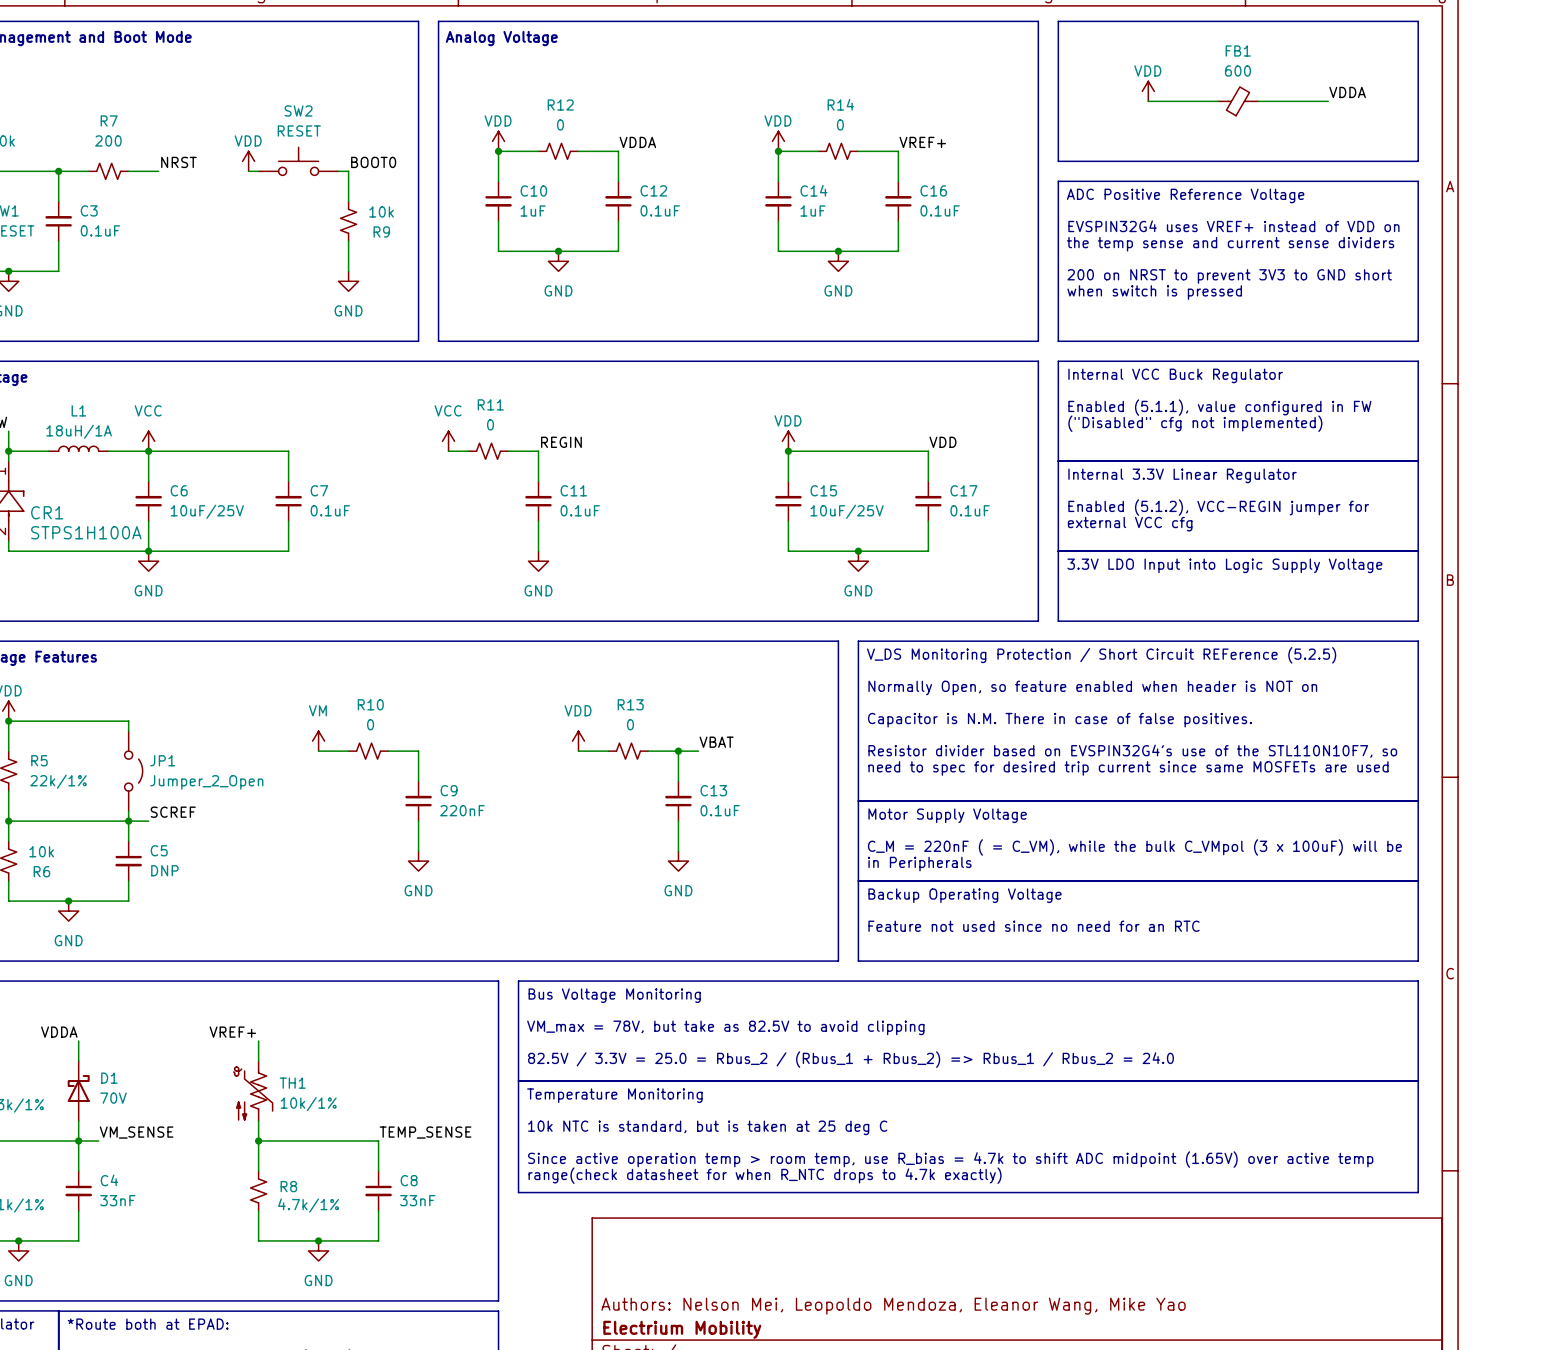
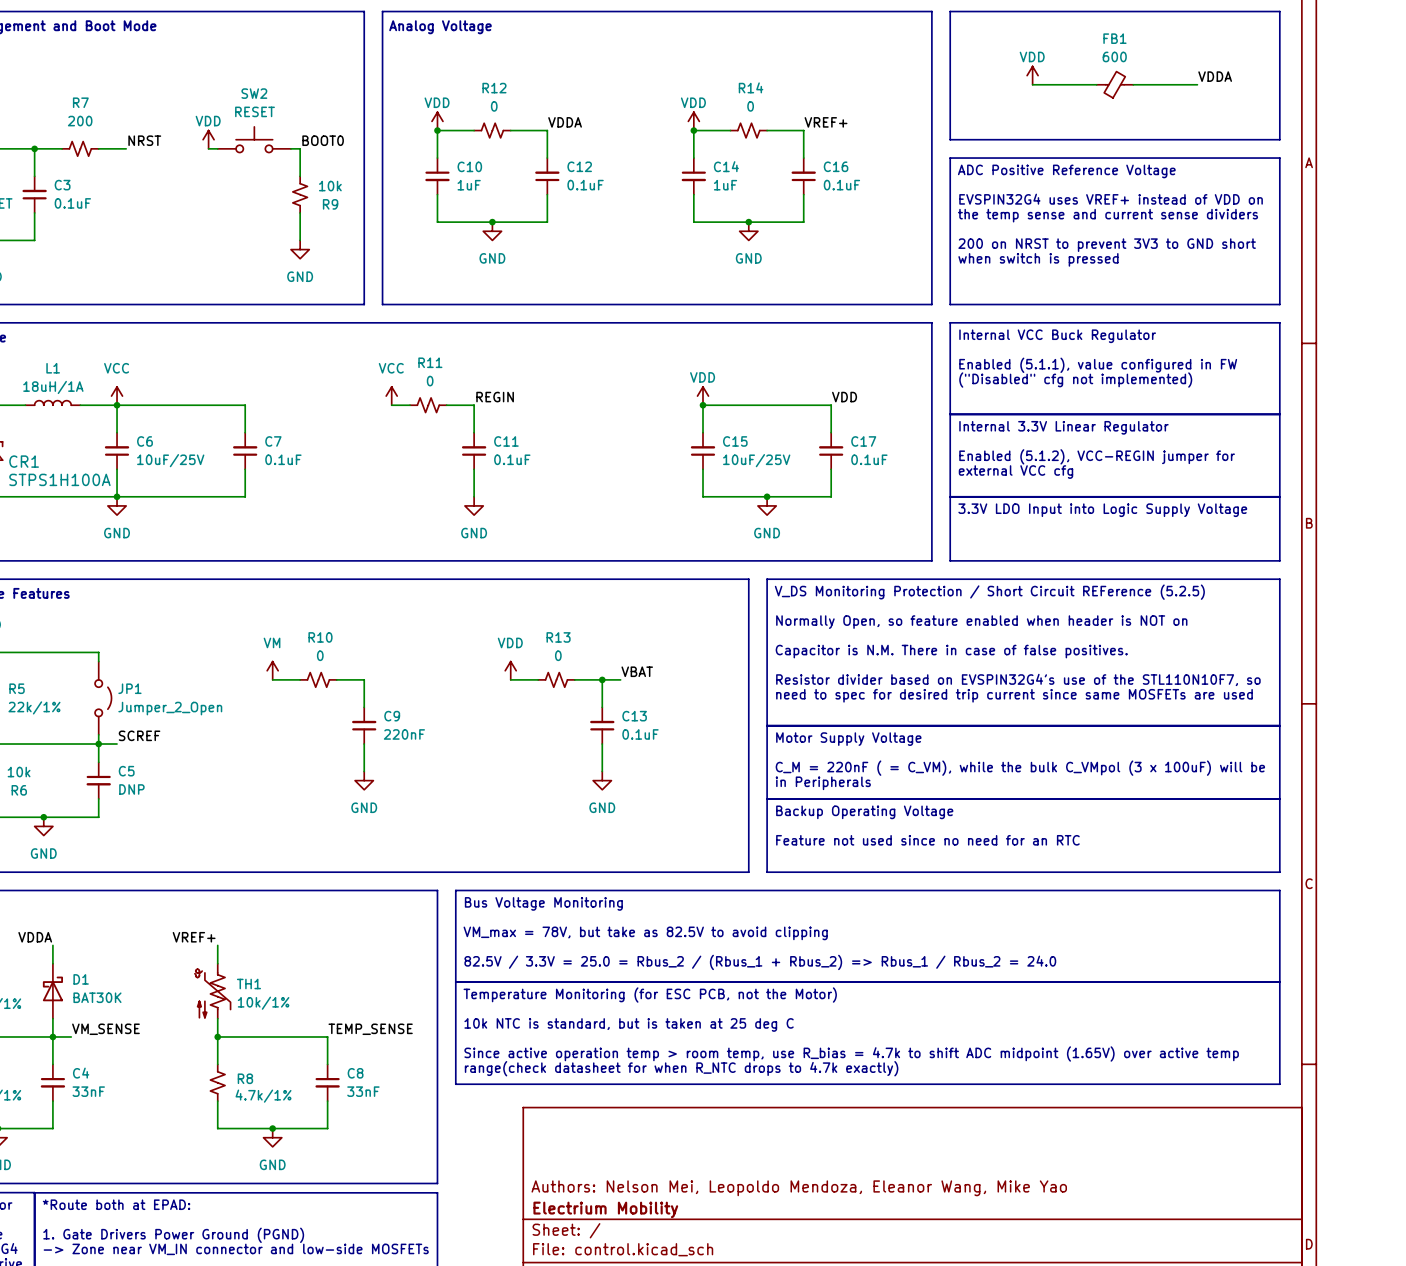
text: Temperature Monitoring (614, 1095) -> Temperature Monitoring (for ESC PCB, not the Motor) (650, 995)
D1 value: 70V (113, 1098) -> BAT30K (97, 997)

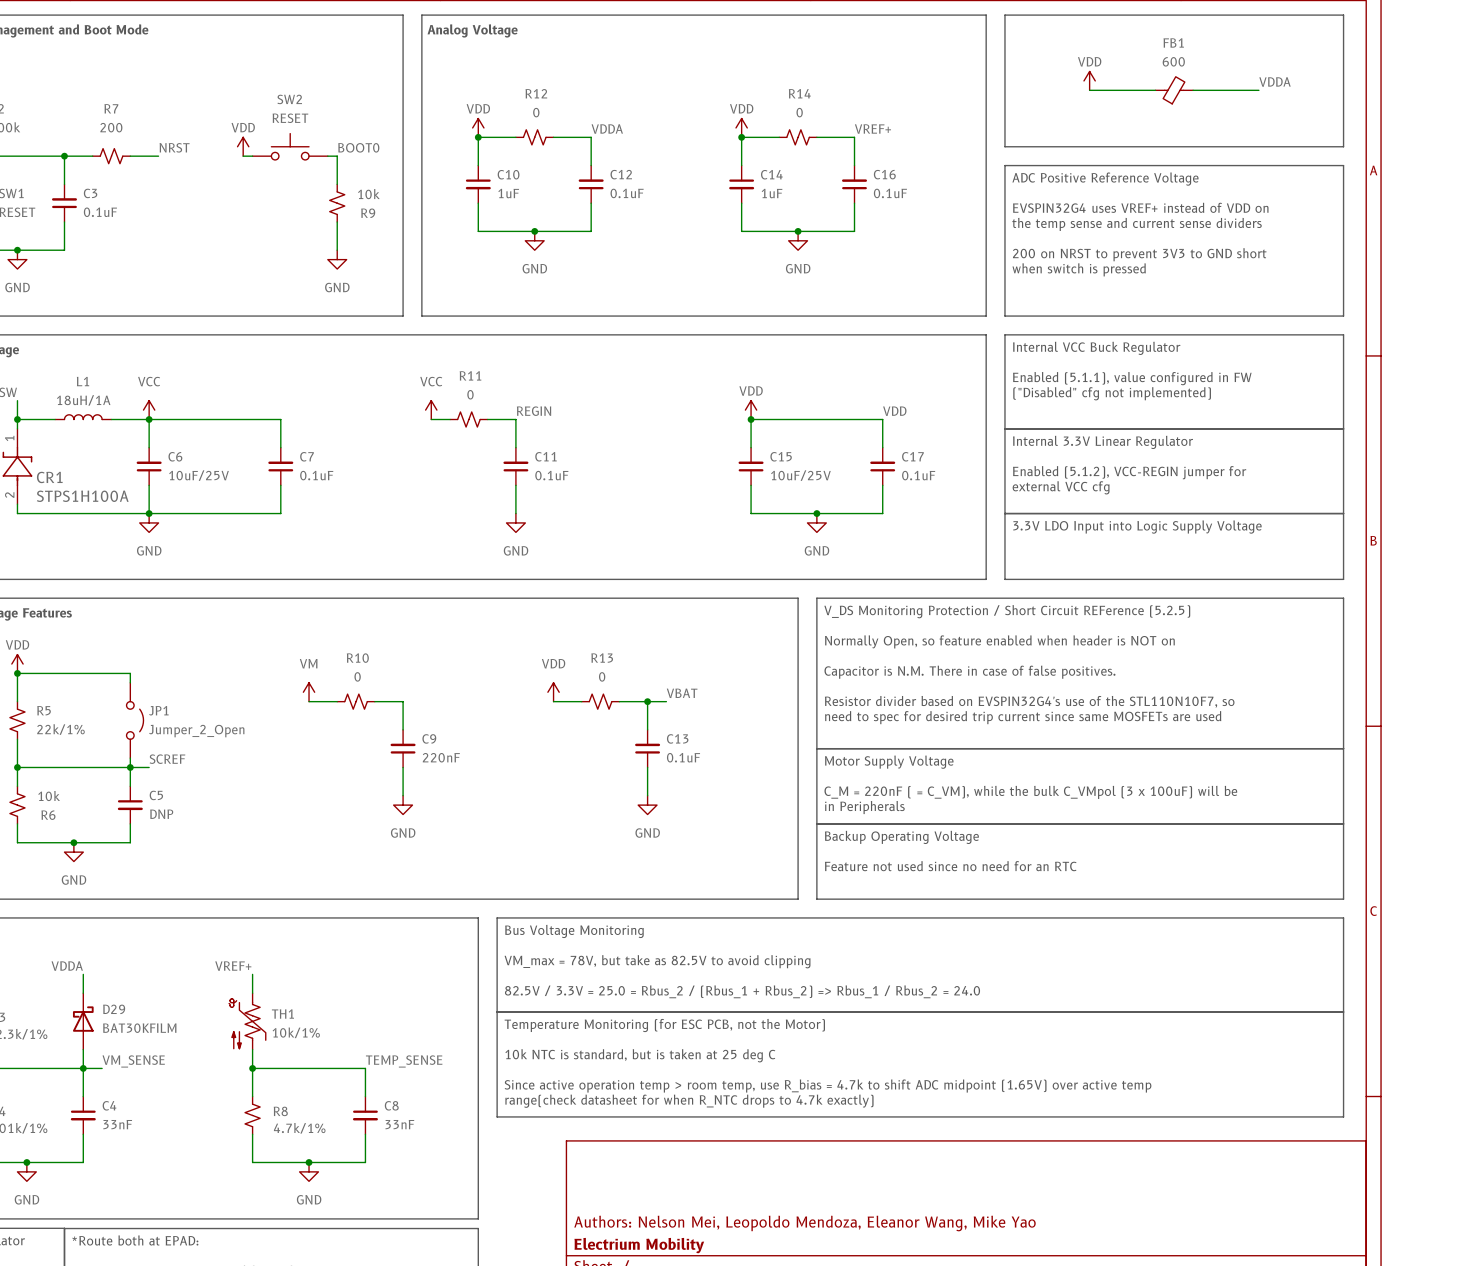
D1 name: D1 (81, 979) -> D29 (114, 1009)
D1 value: BAT30K (97, 997) -> BAT30KFILM (139, 1028)

